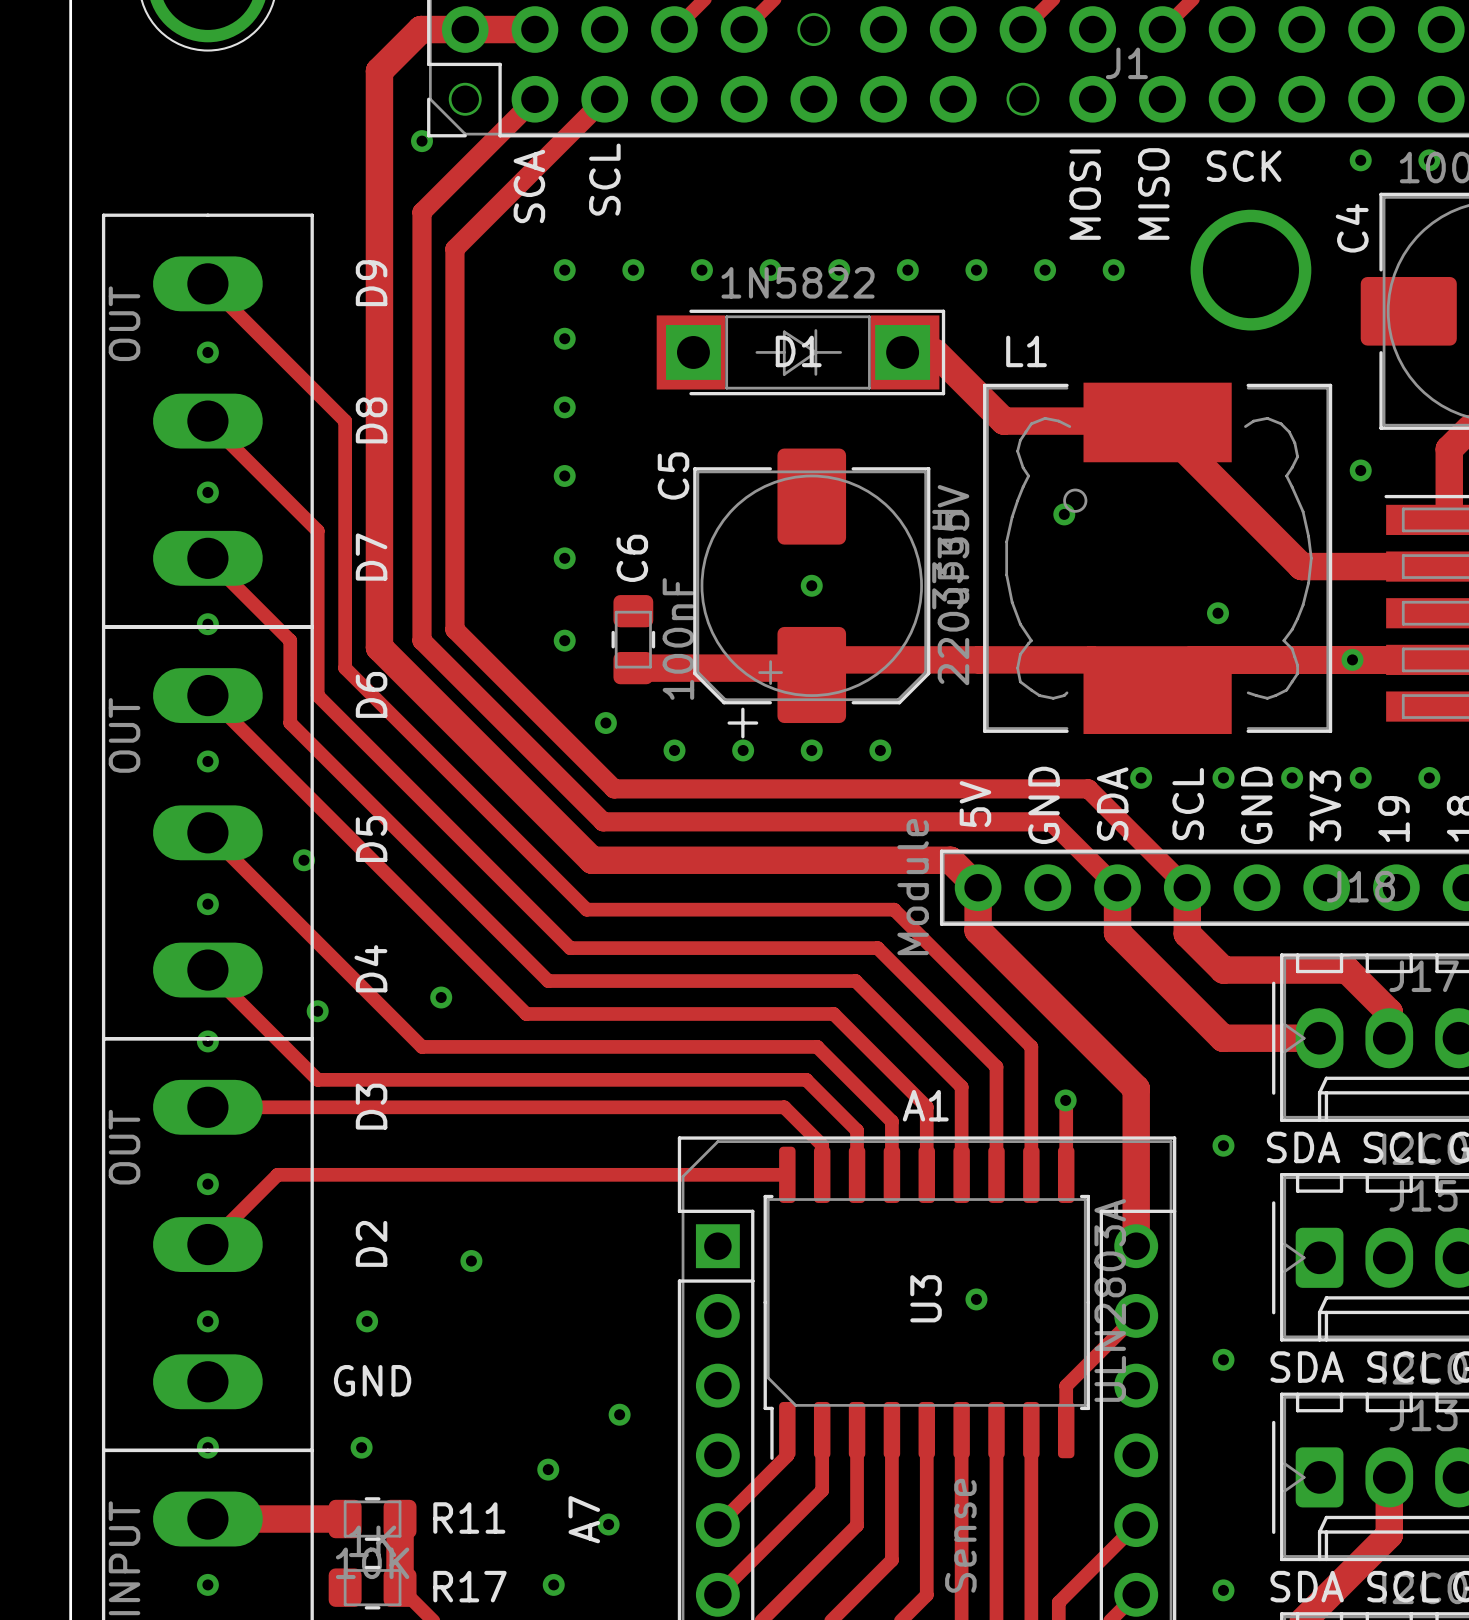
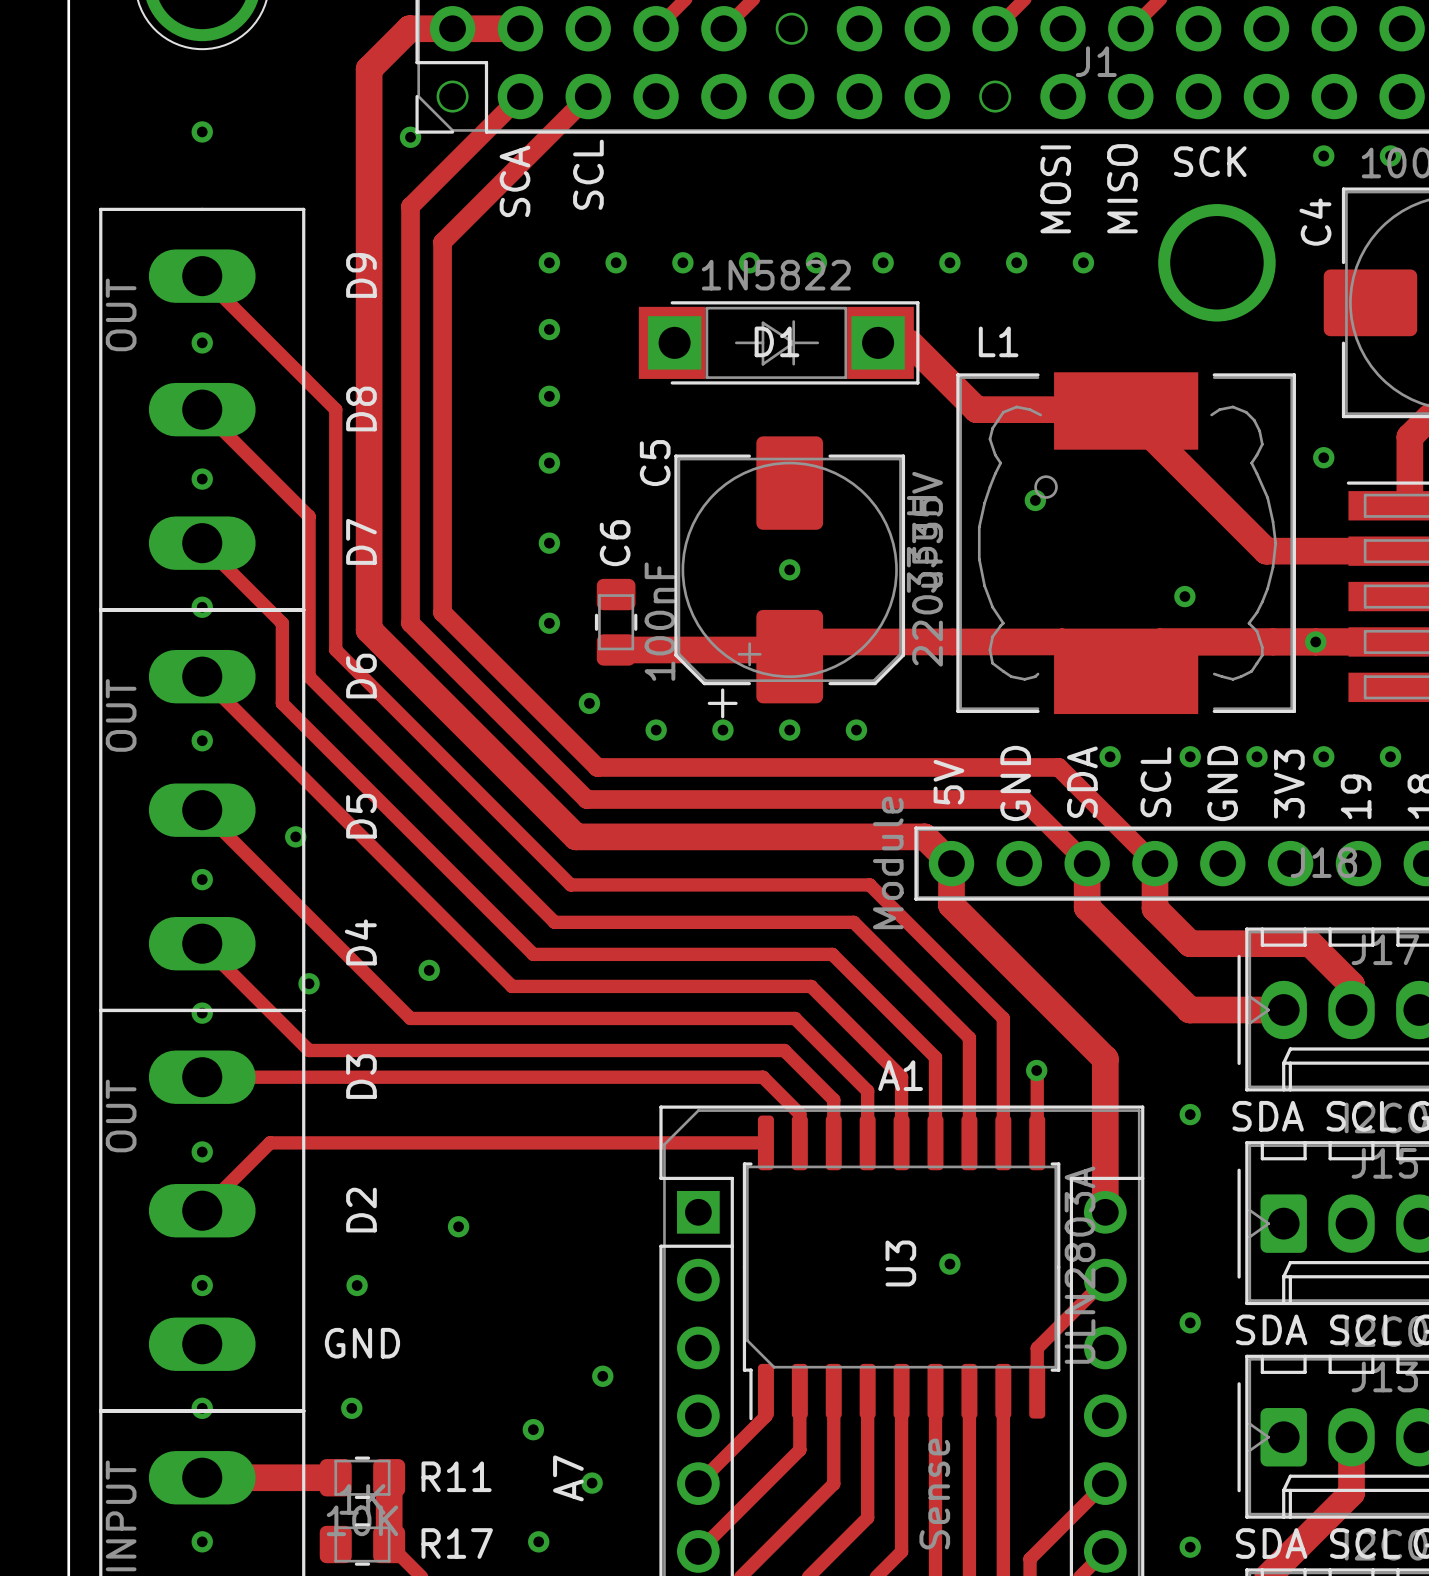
via: none -> (202, 131)

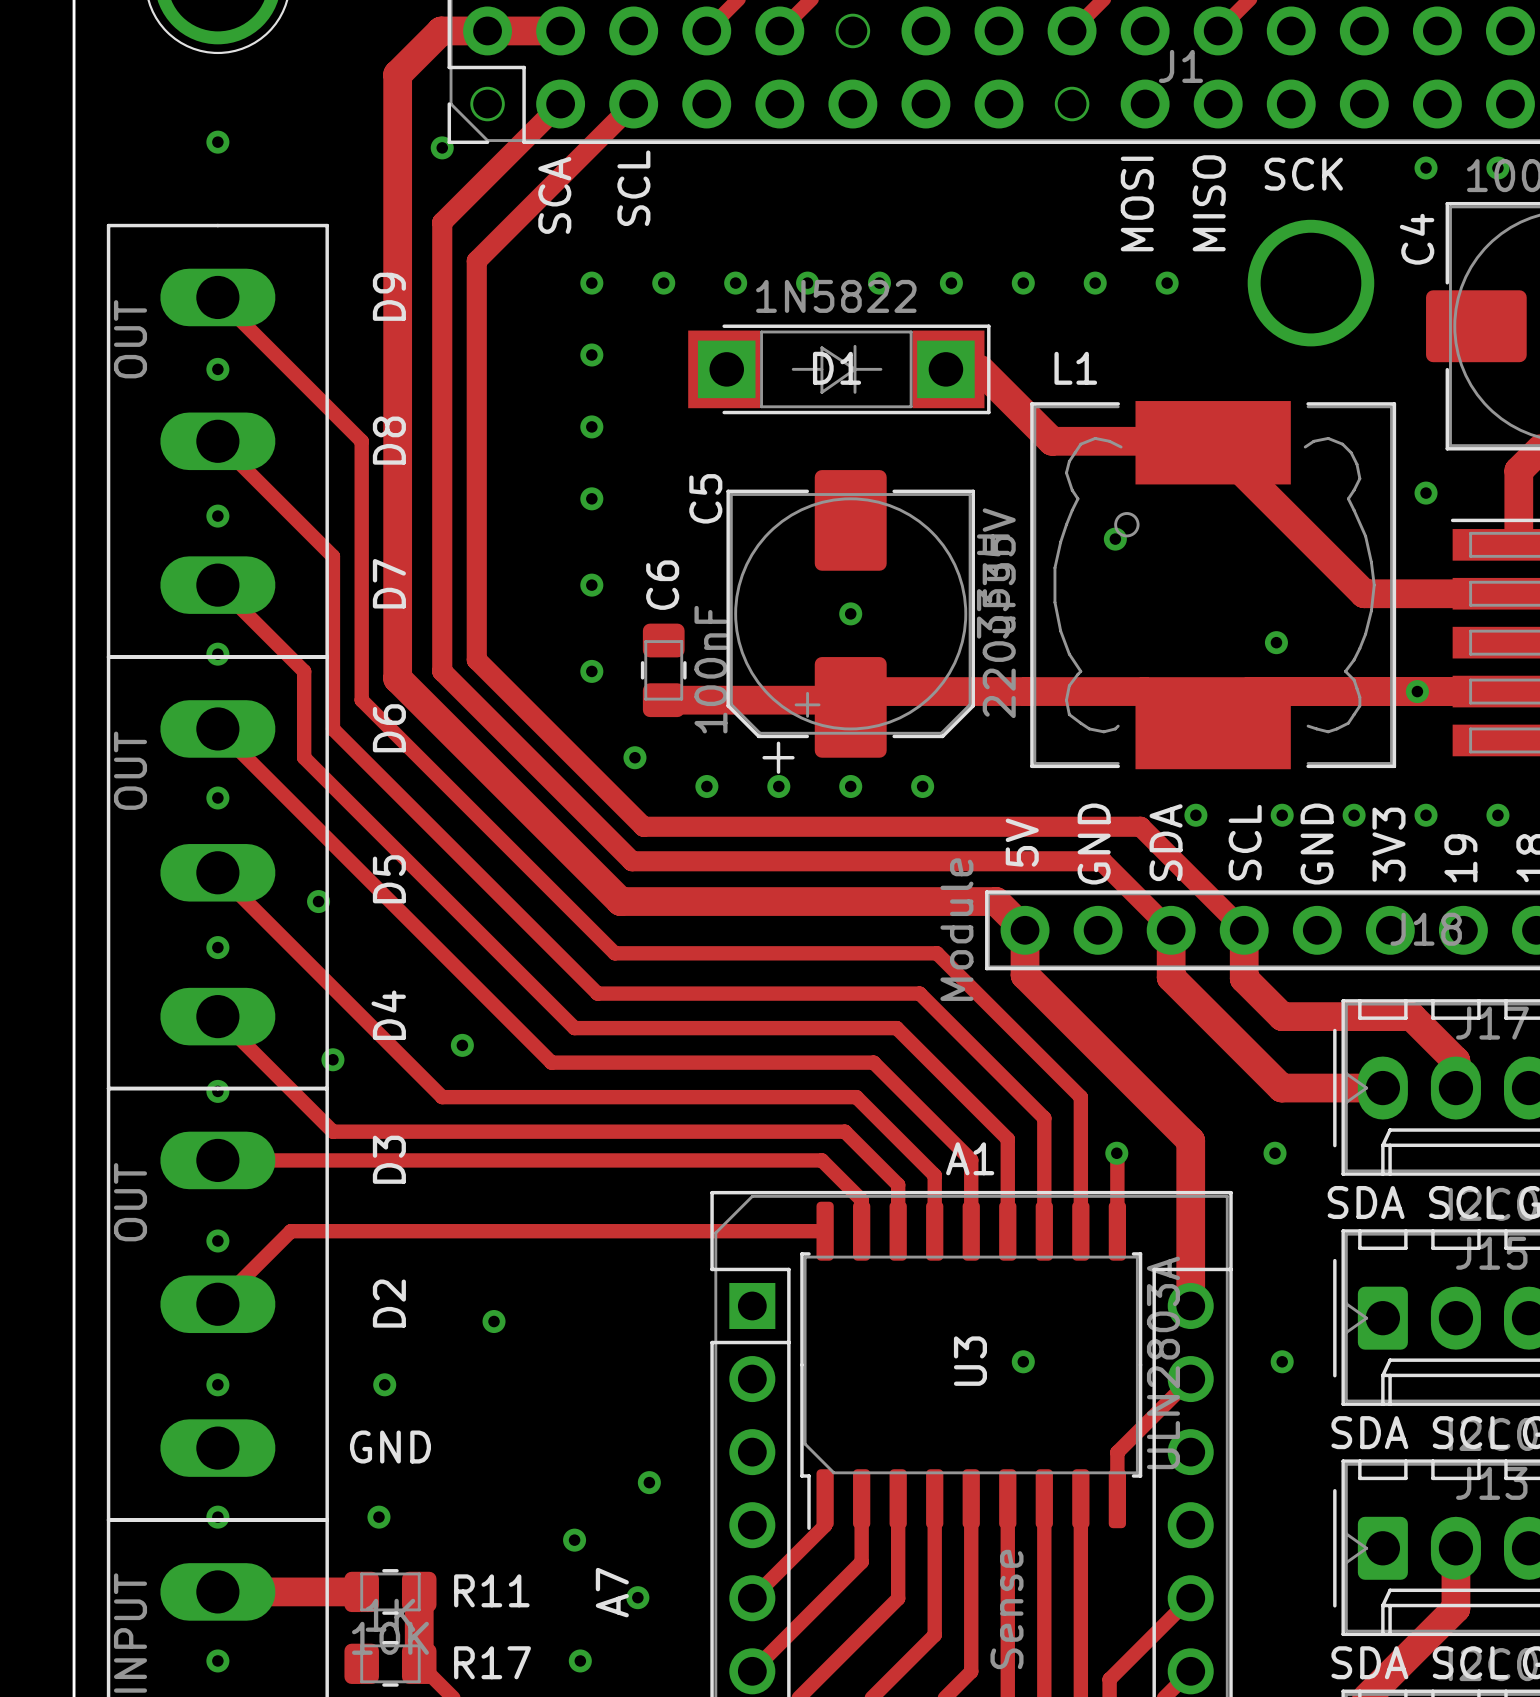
via position: (1190, 1114) -> (1275, 1153)
via position: (1190, 1322) -> (1282, 1361)
via: (1190, 1547) -> none

